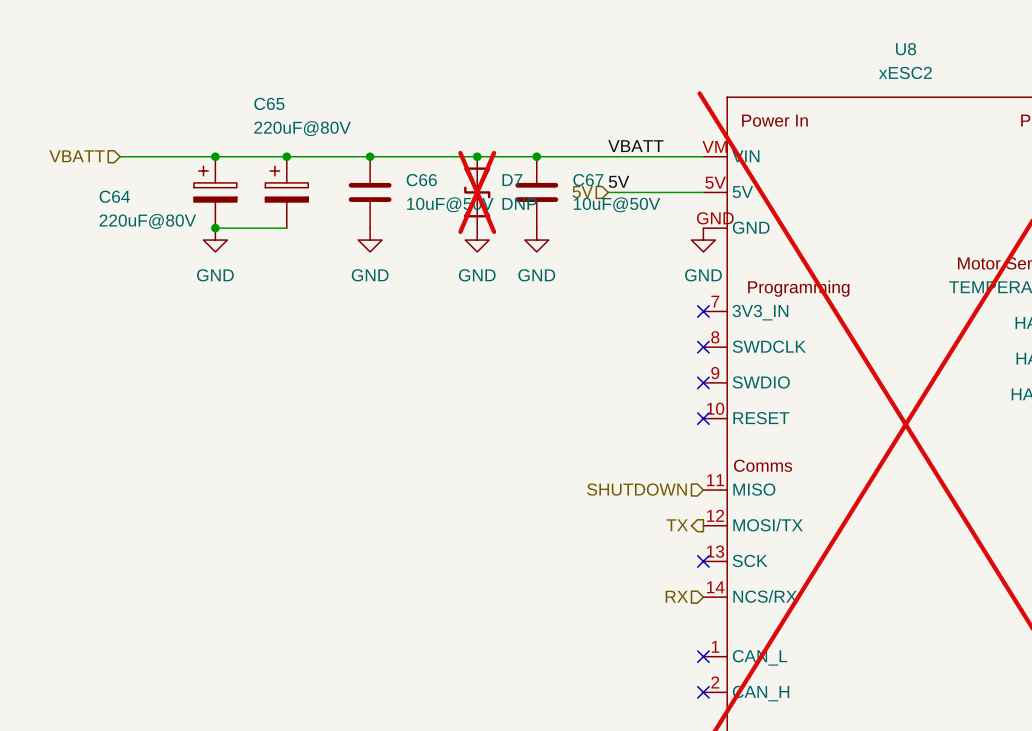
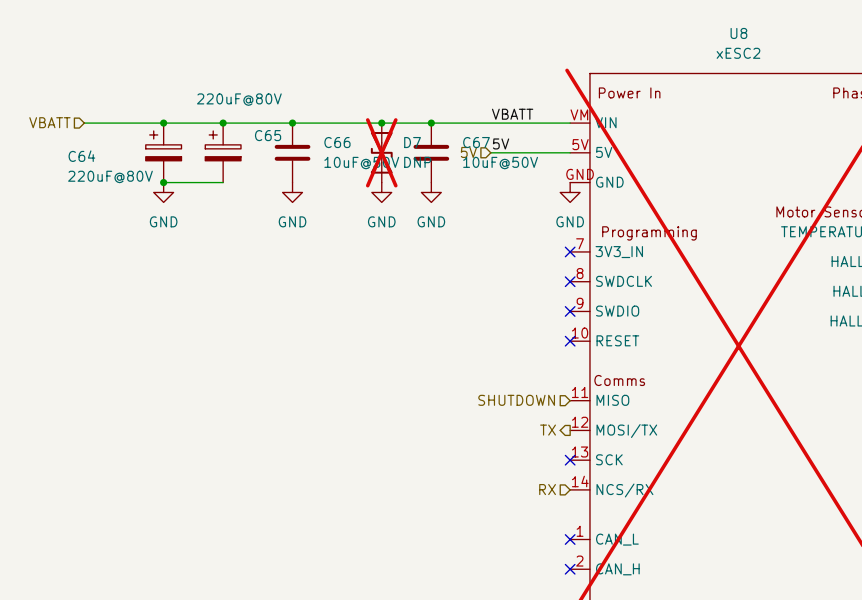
C65 name position: C65 (269, 103) -> C65 (268, 135)

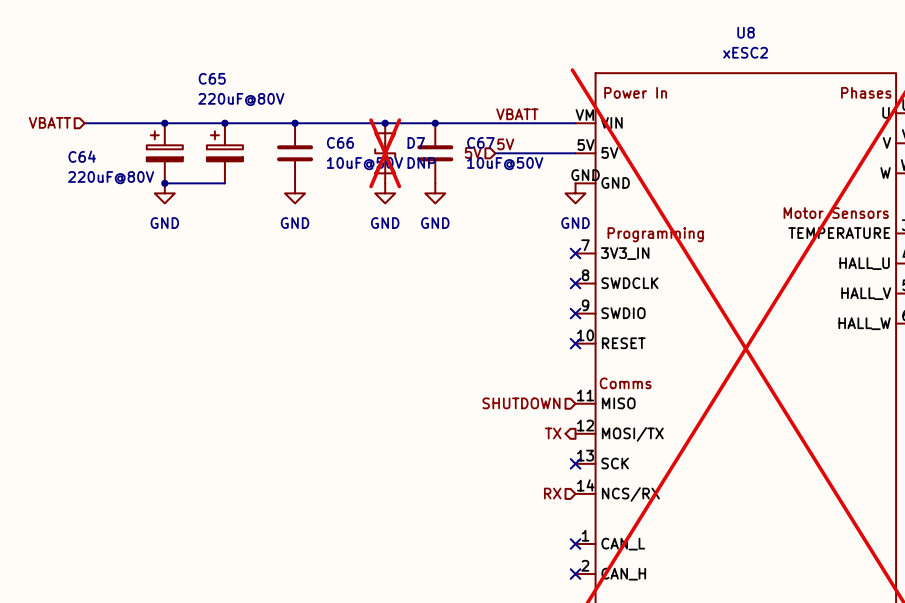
C65 name position: C65 (268, 135) -> C65 (212, 78)

